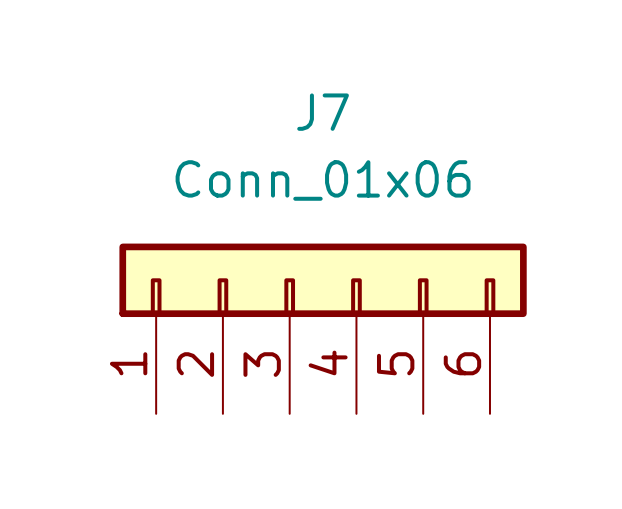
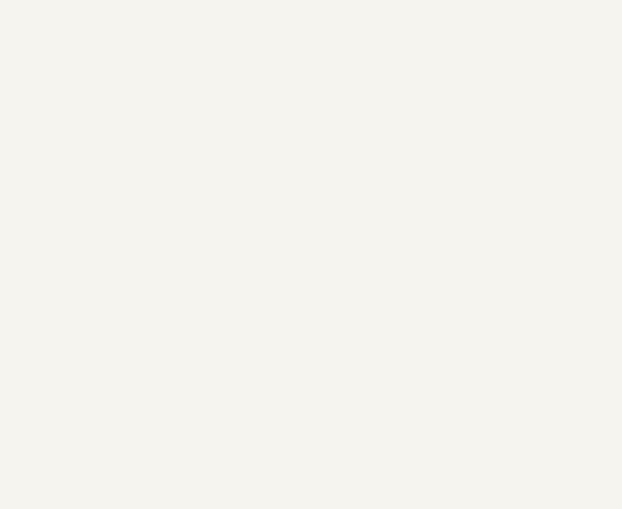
J7: Conn_01x06 (323, 328) -> none

